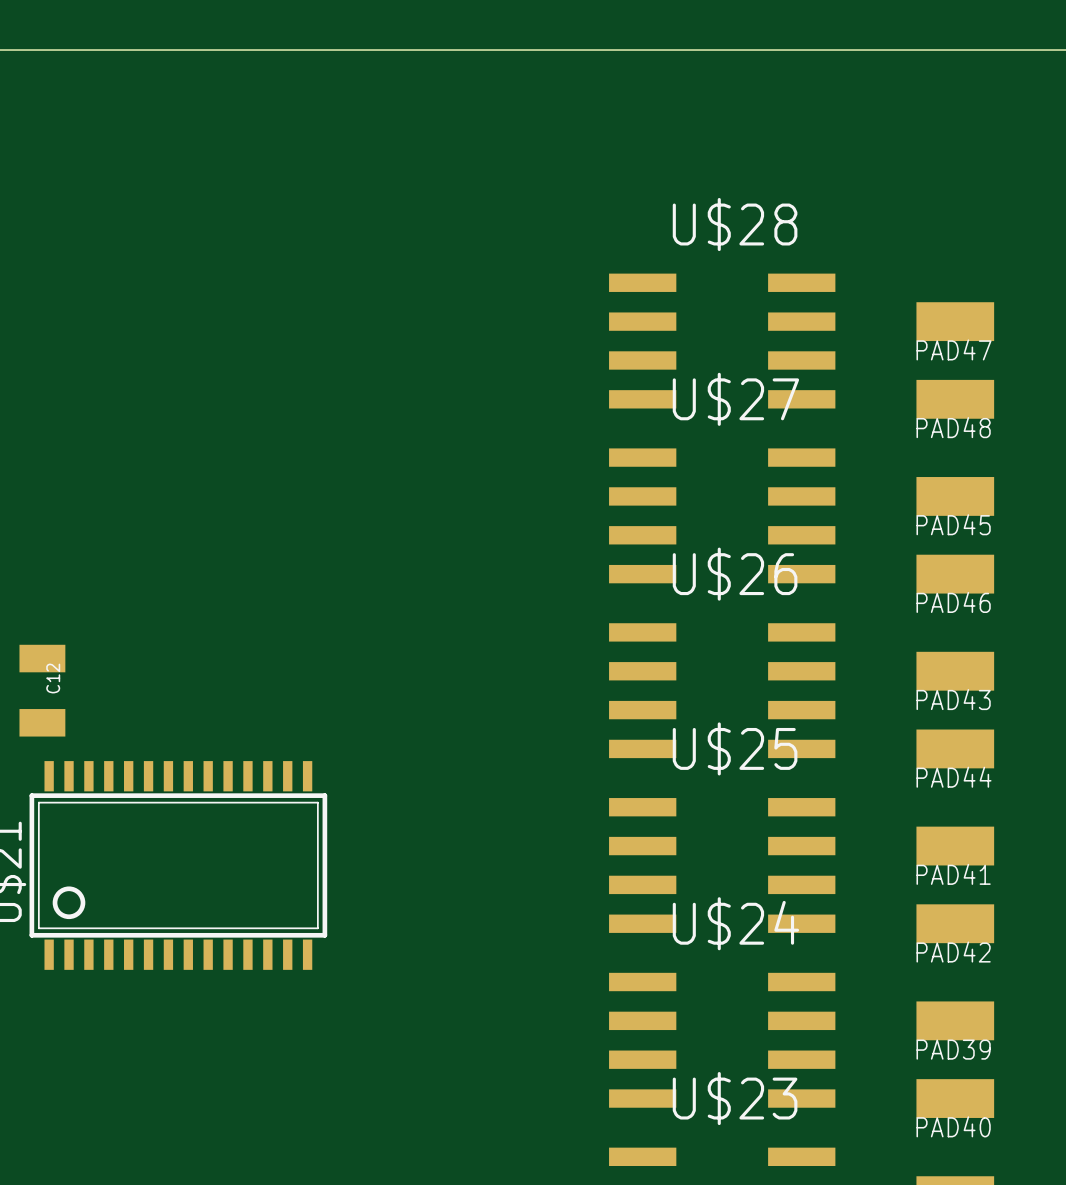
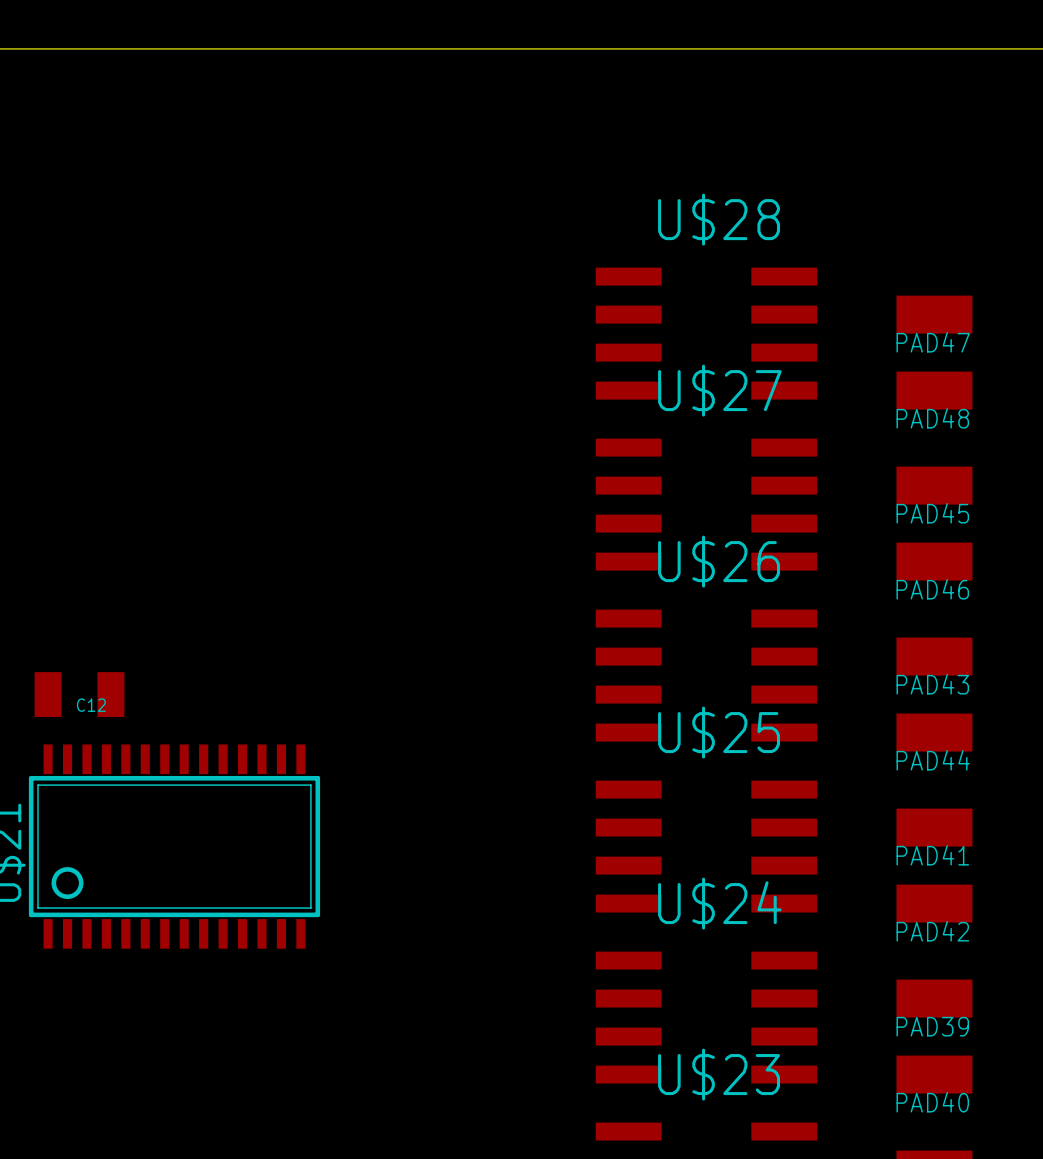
C12 rotation: 0° (42, 690) -> 90° clockwise (79, 694)

